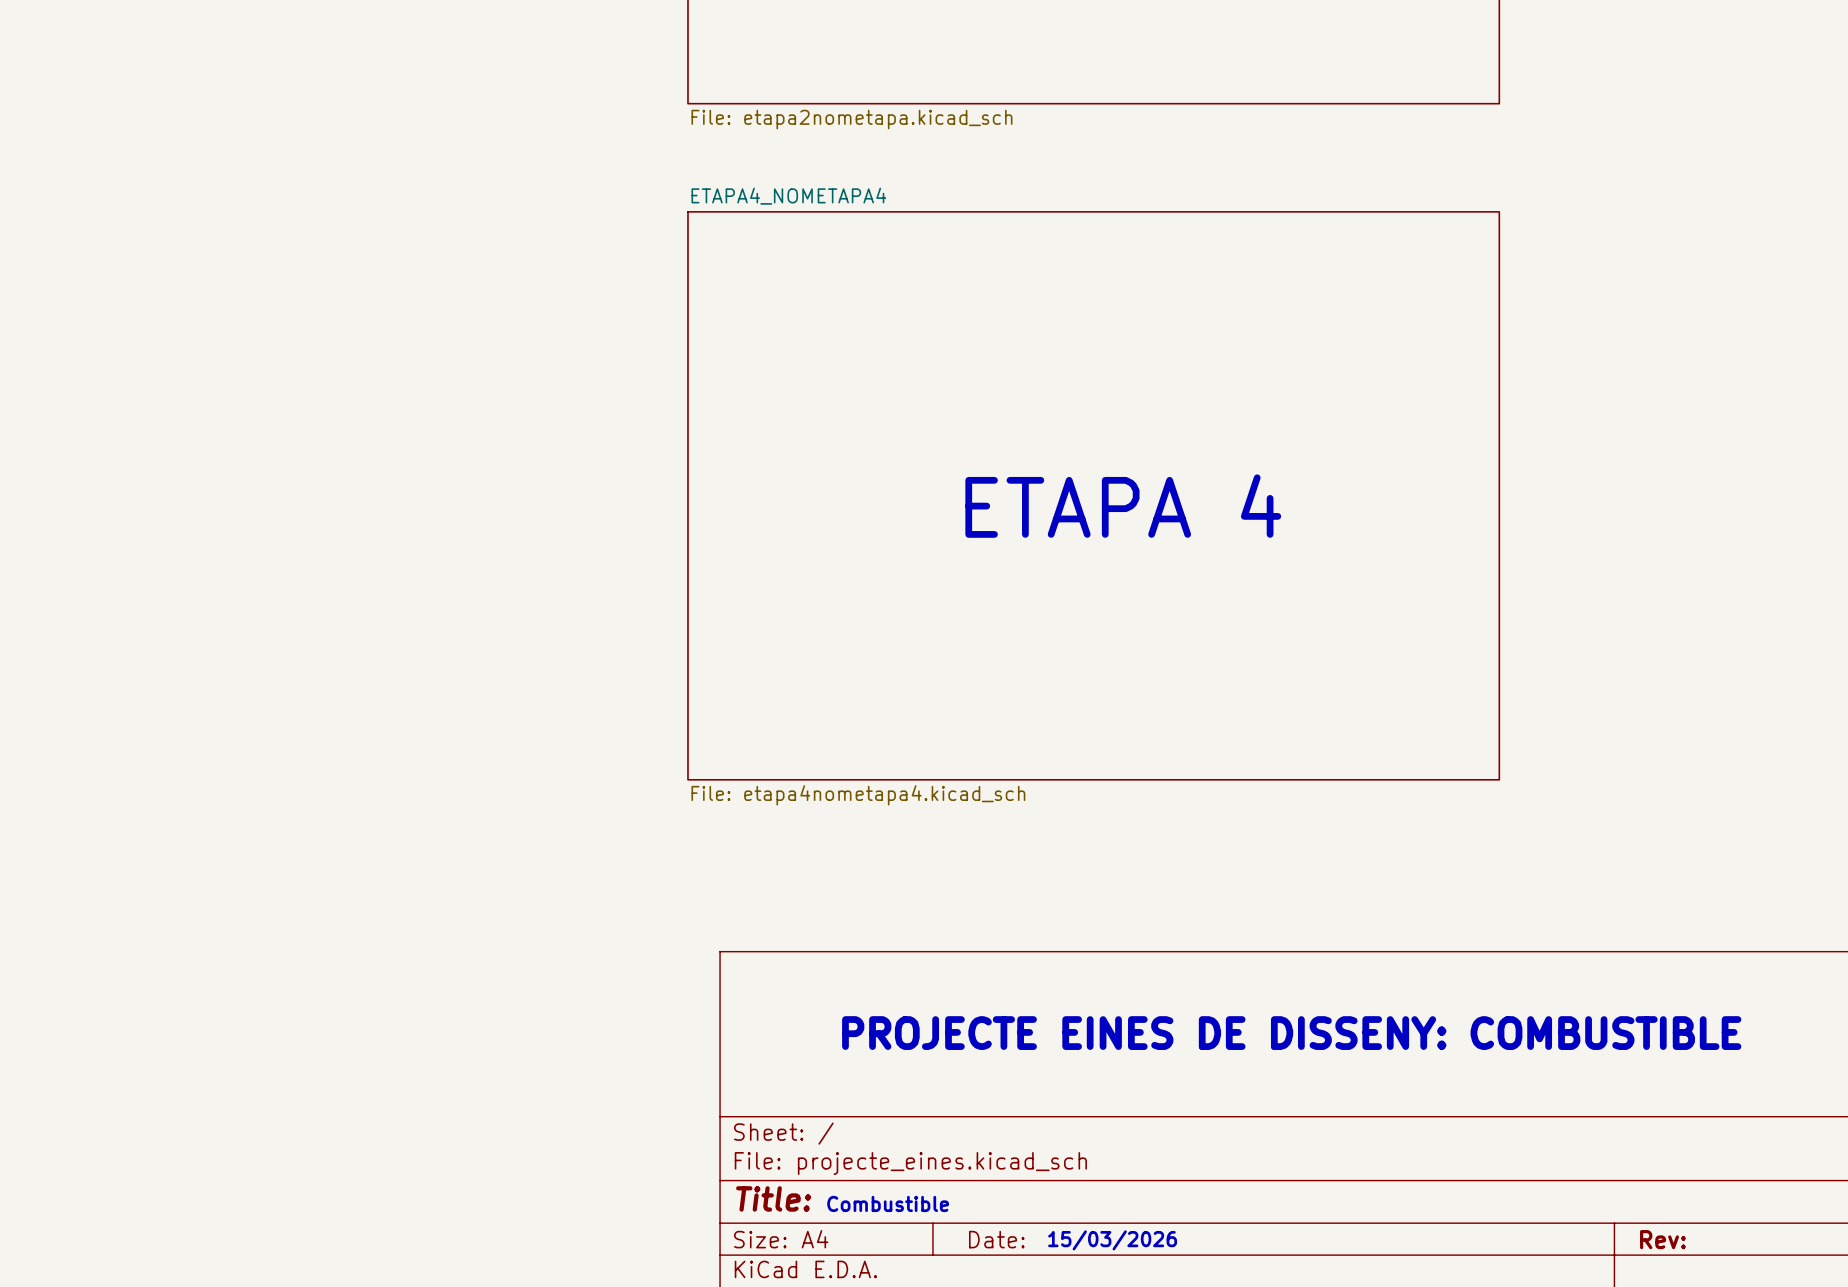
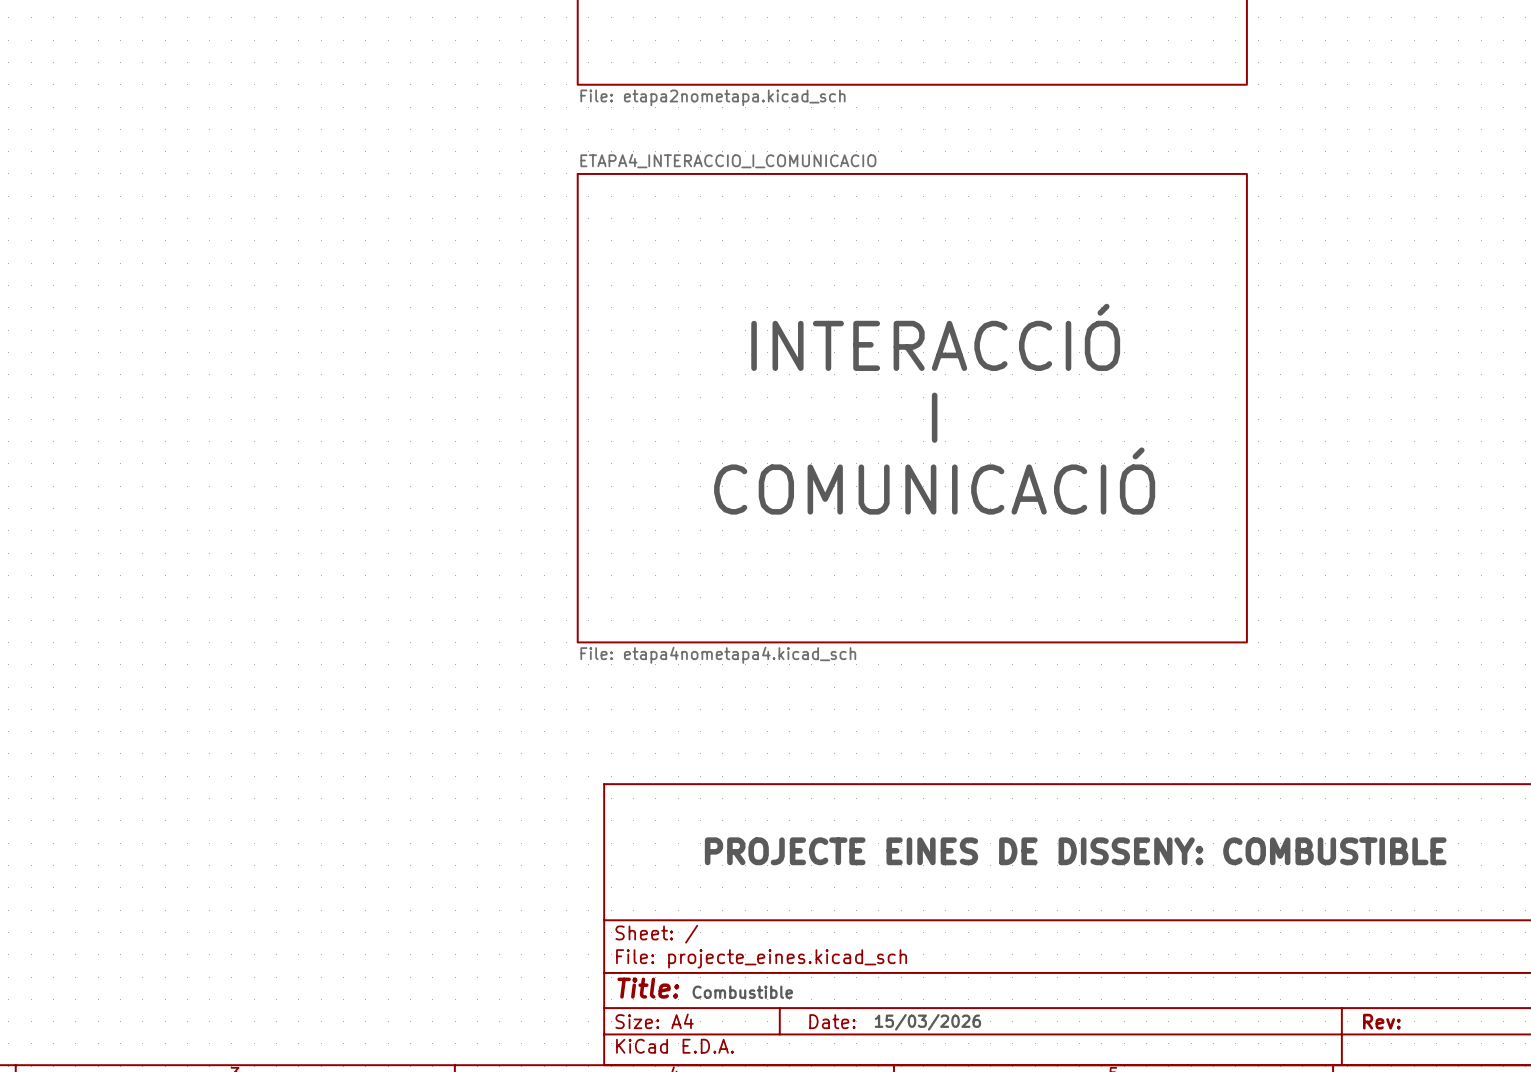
sheet ETAPA4_NOMETAPA4 name: ETAPA4_NOMETAPA4 (788, 196) -> ETAPA4_INTERACCIO_I_COMUNICACIO (728, 161)
text: none -> INTERACCIÓ (935, 337)
text: ETAPA 4 (1123, 506) -> I (934, 417)
text: none -> COMUNICACIÓ (934, 481)

